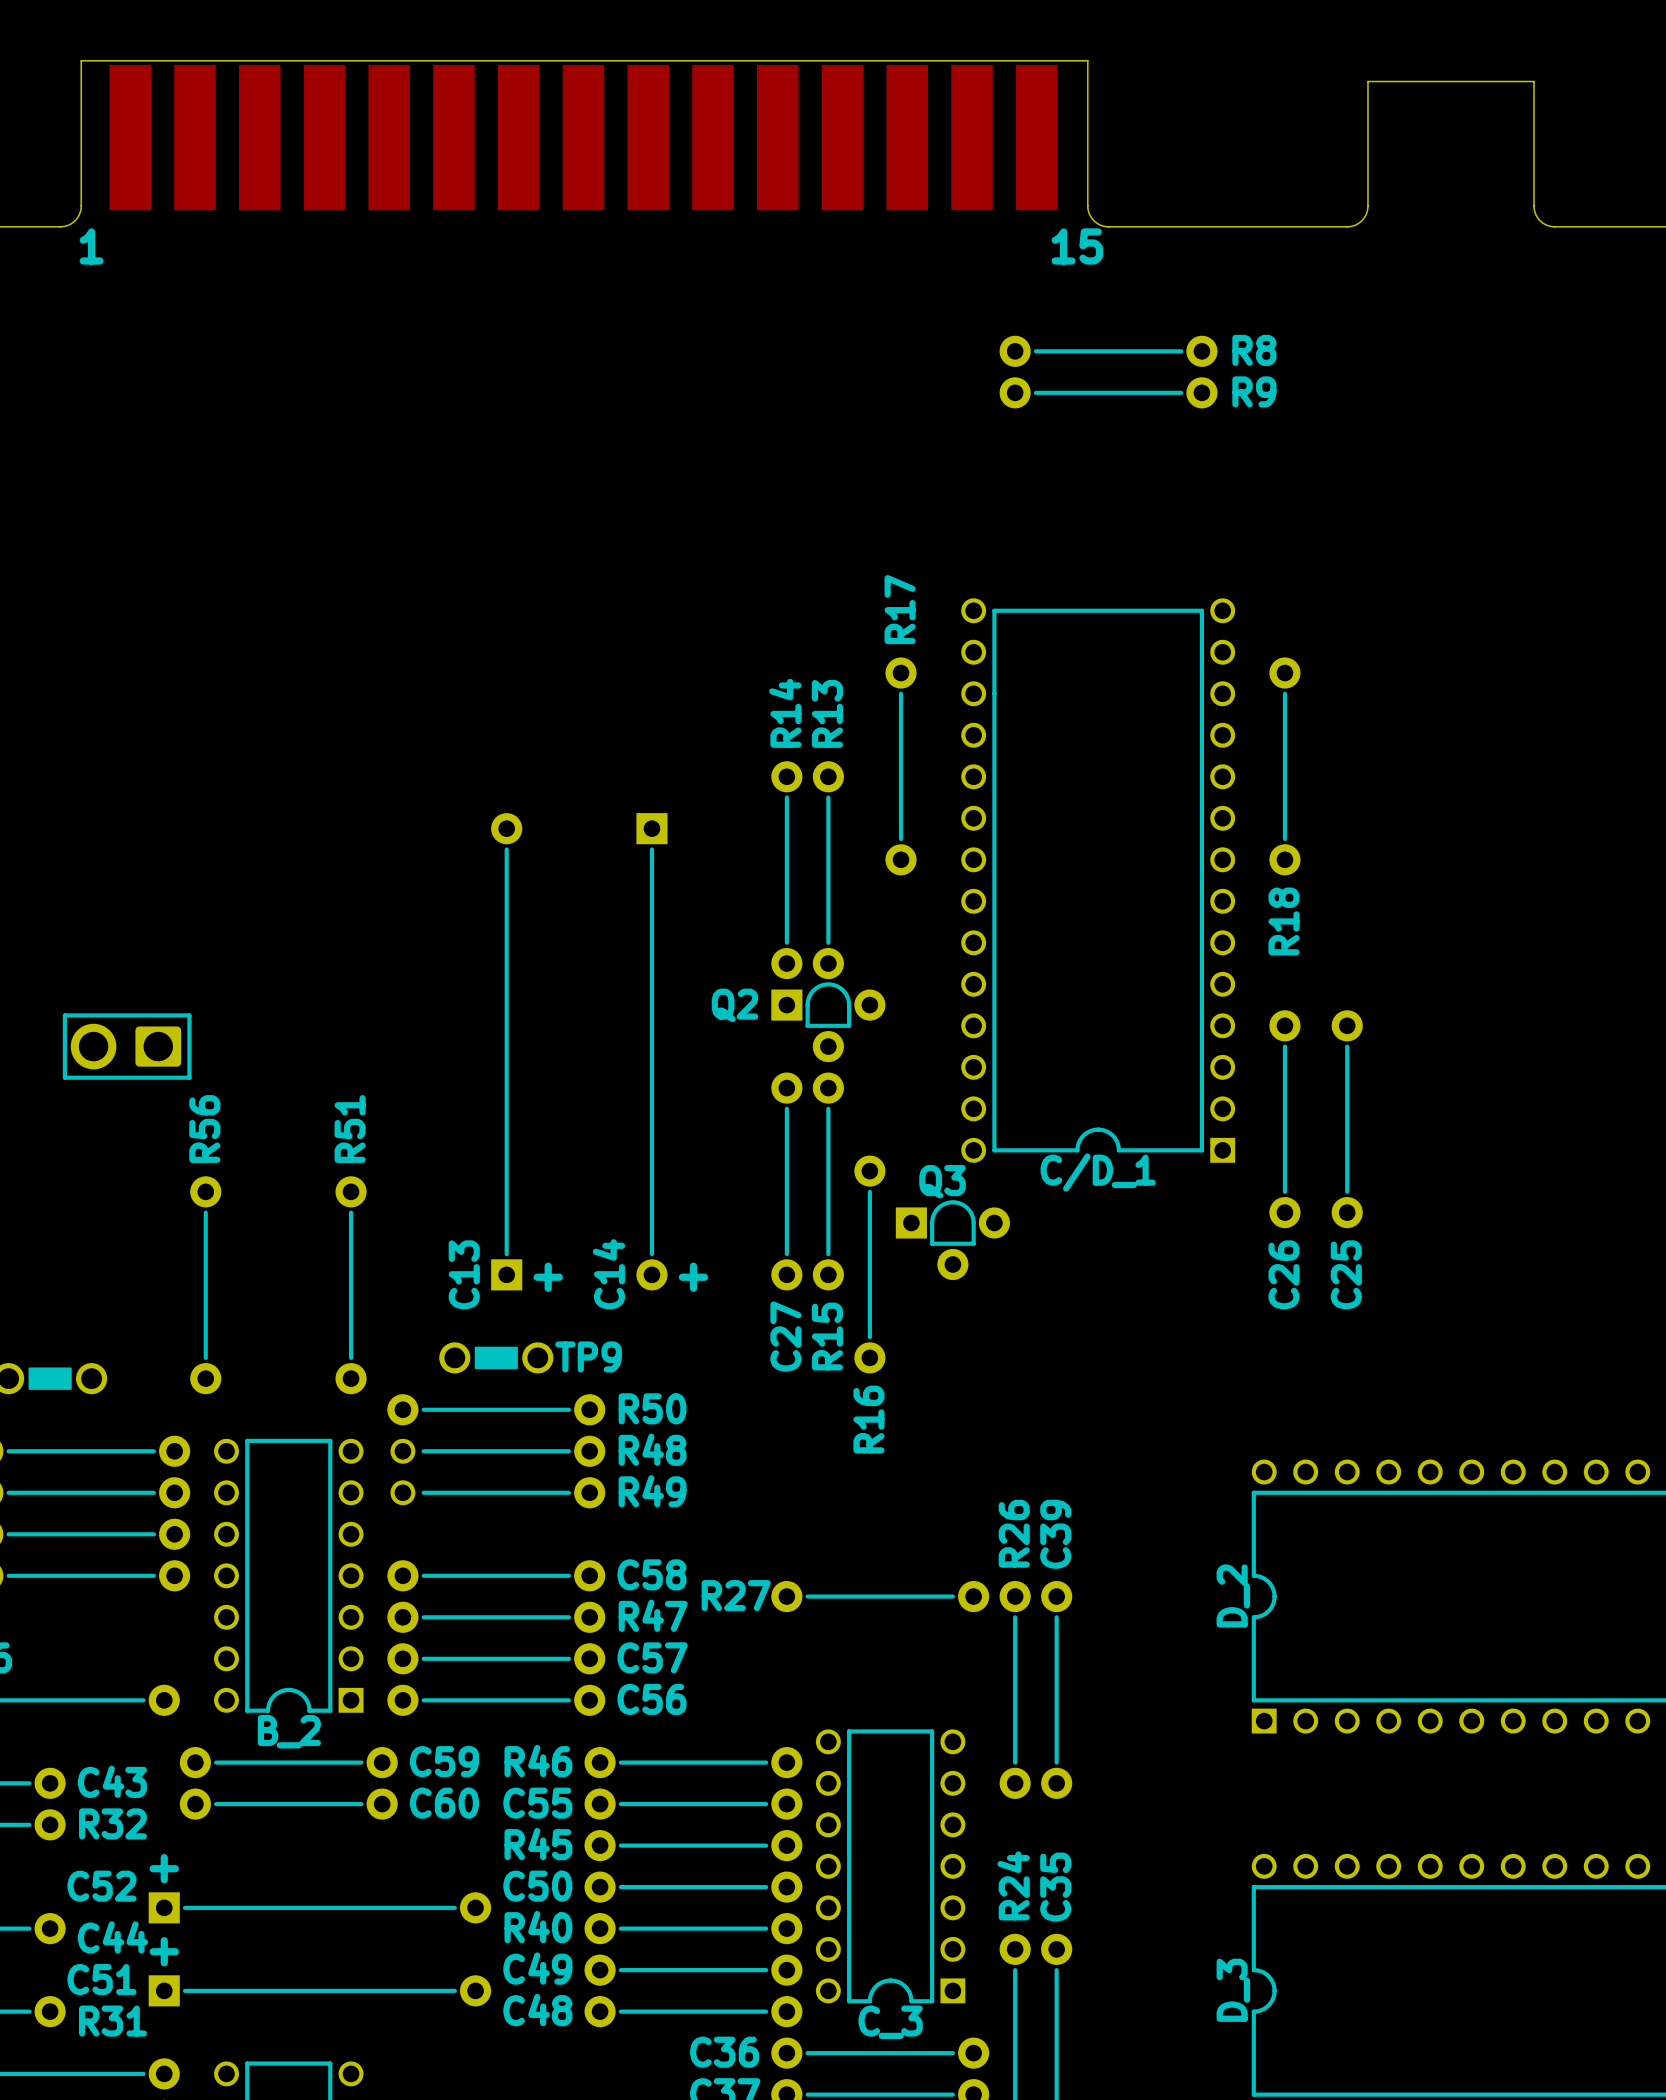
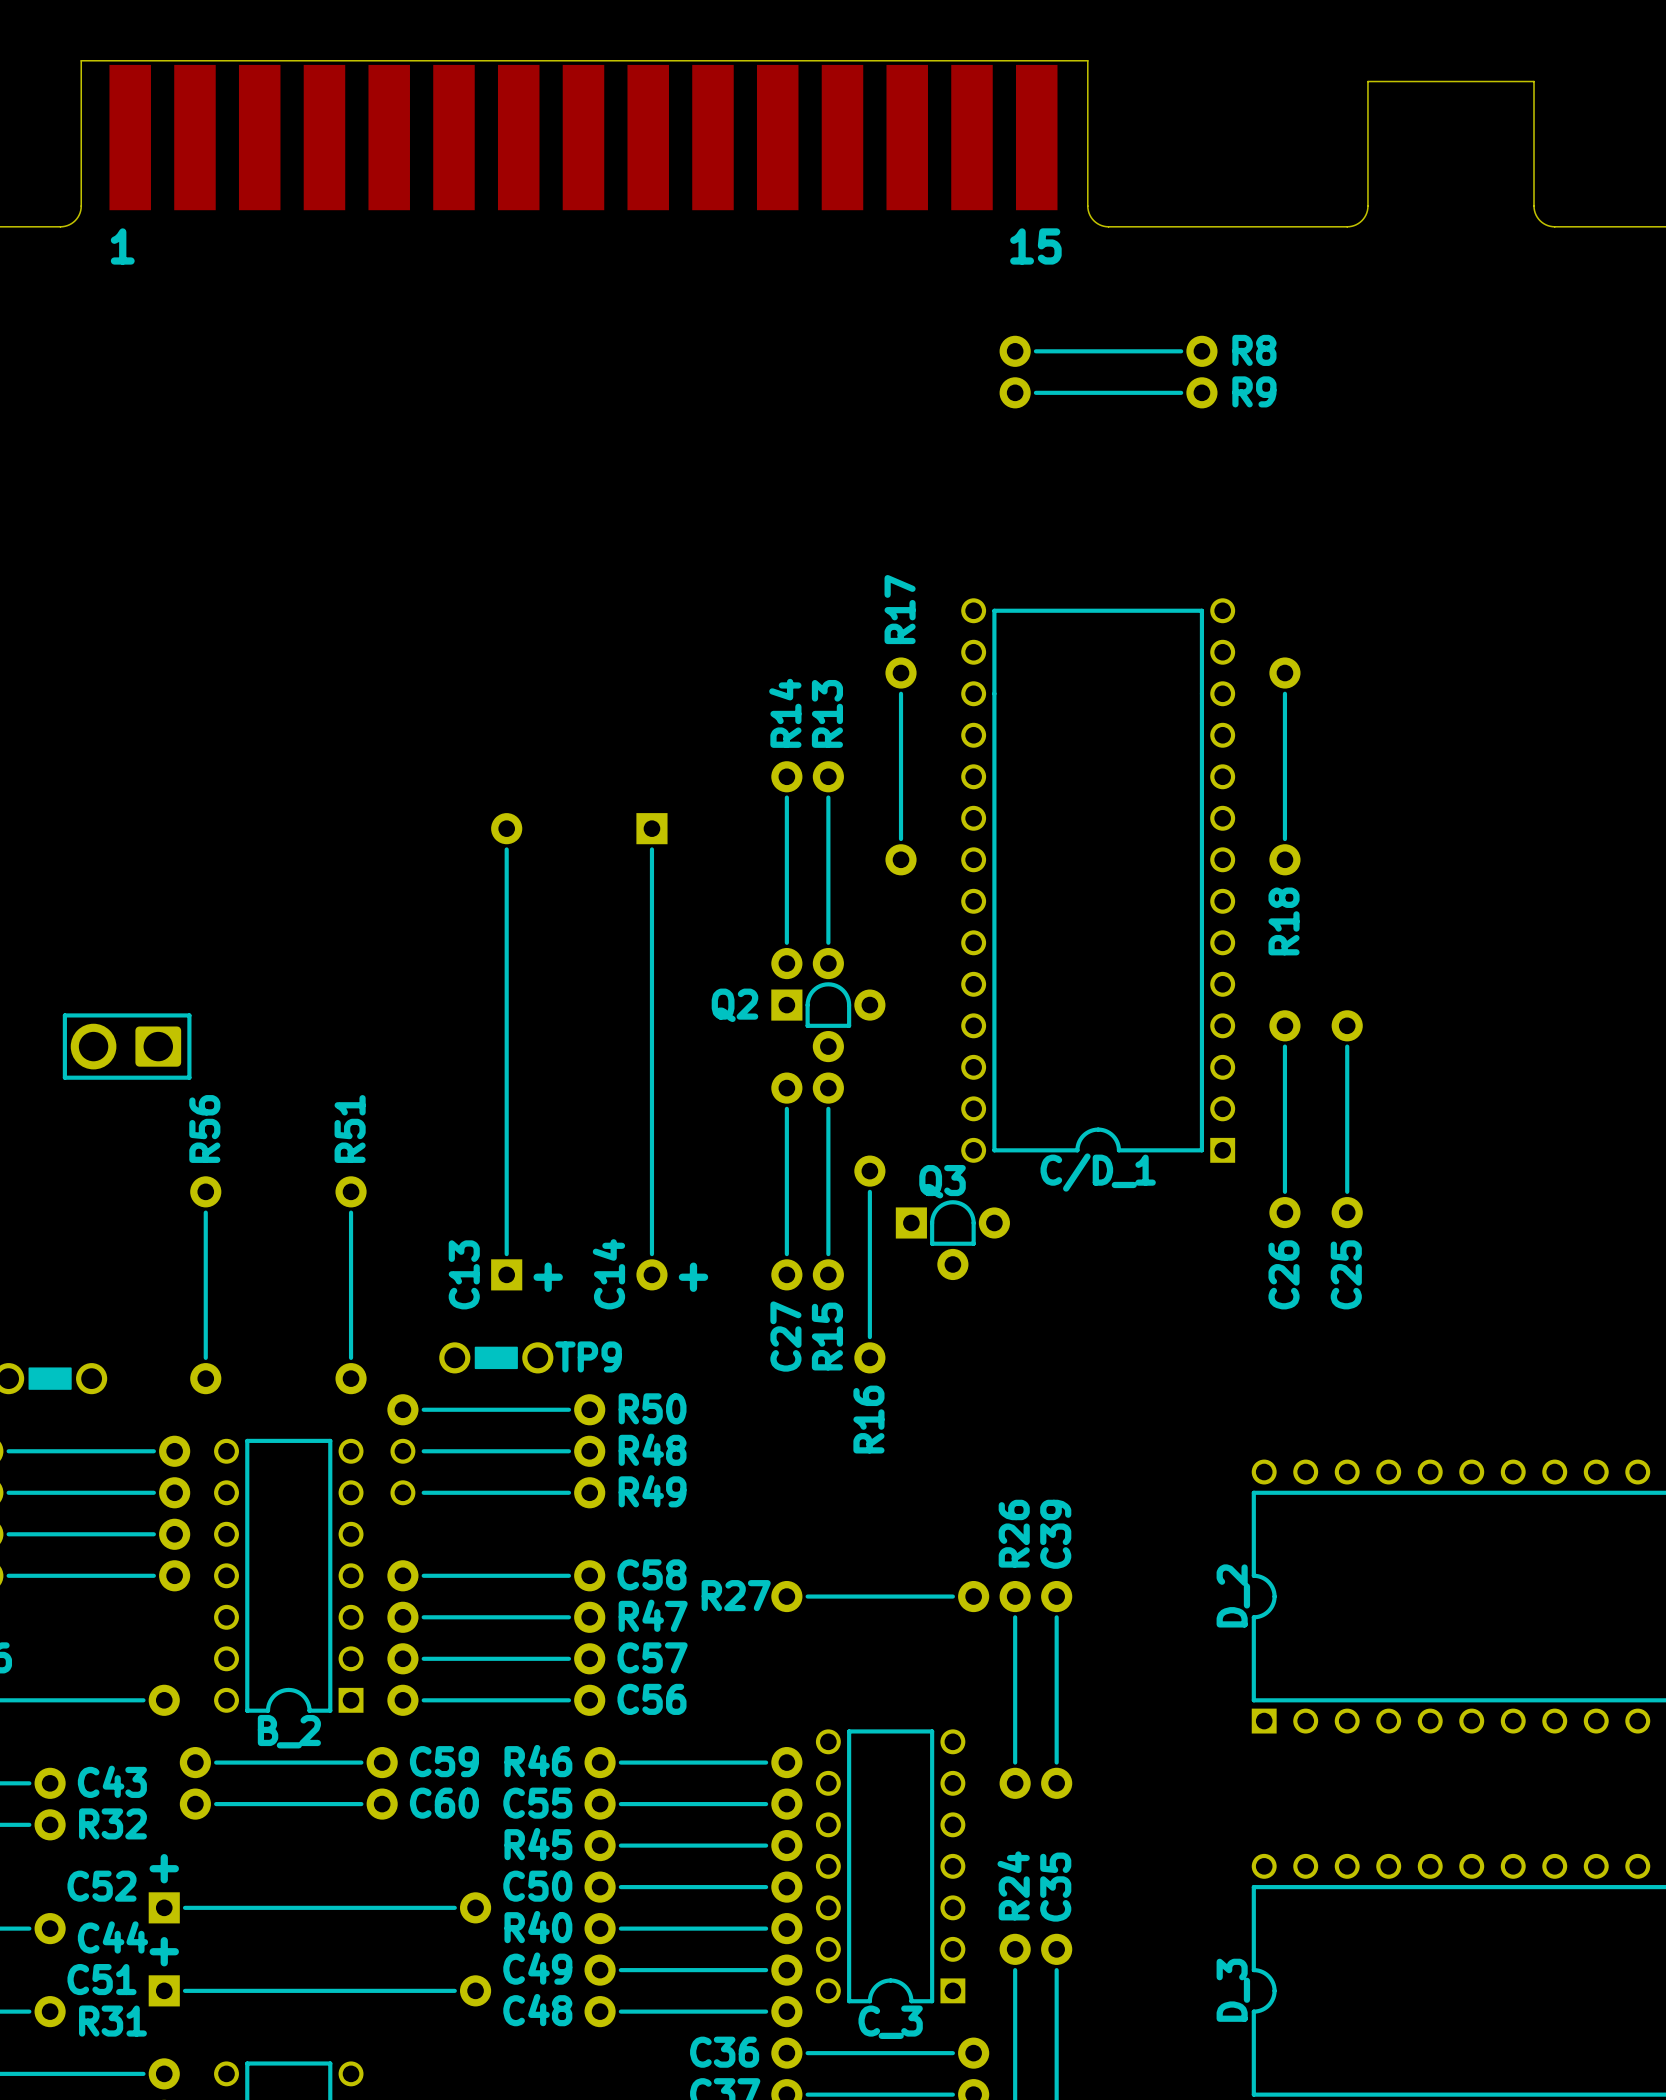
text position: 1 (91, 246) -> 1 (122, 246)
text position: 15 (1077, 246) -> 15 (1035, 246)

